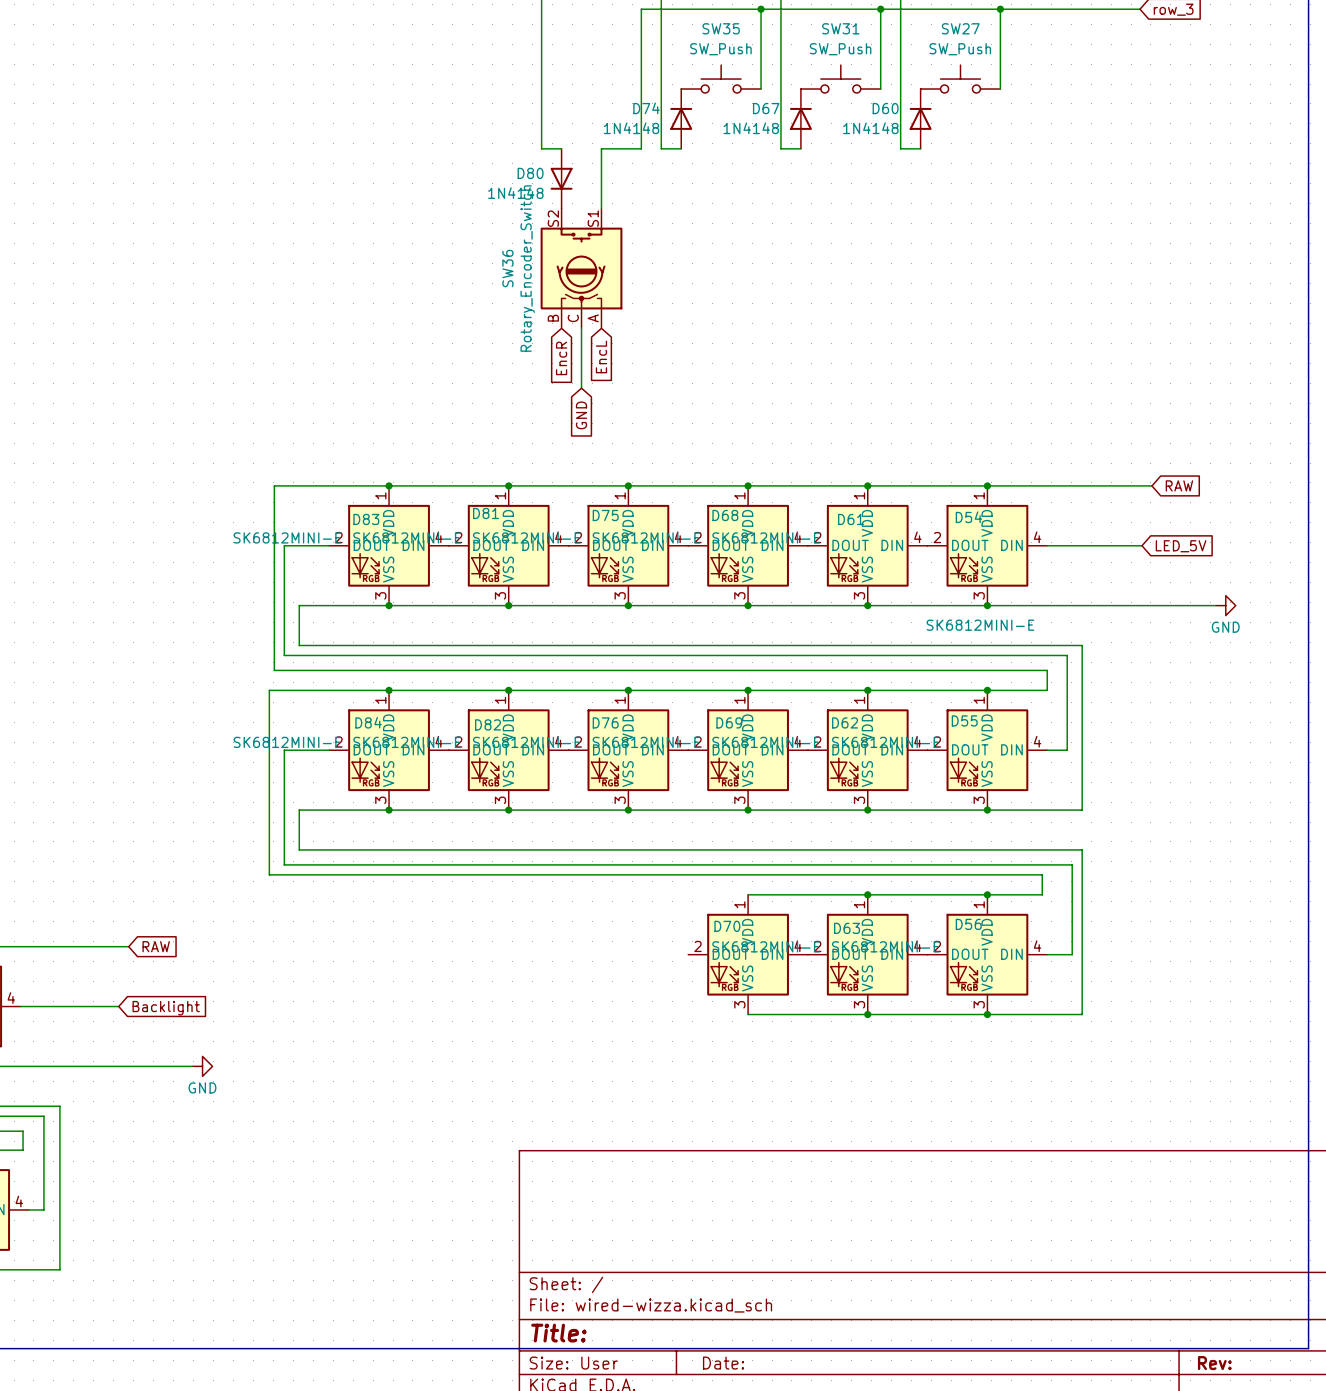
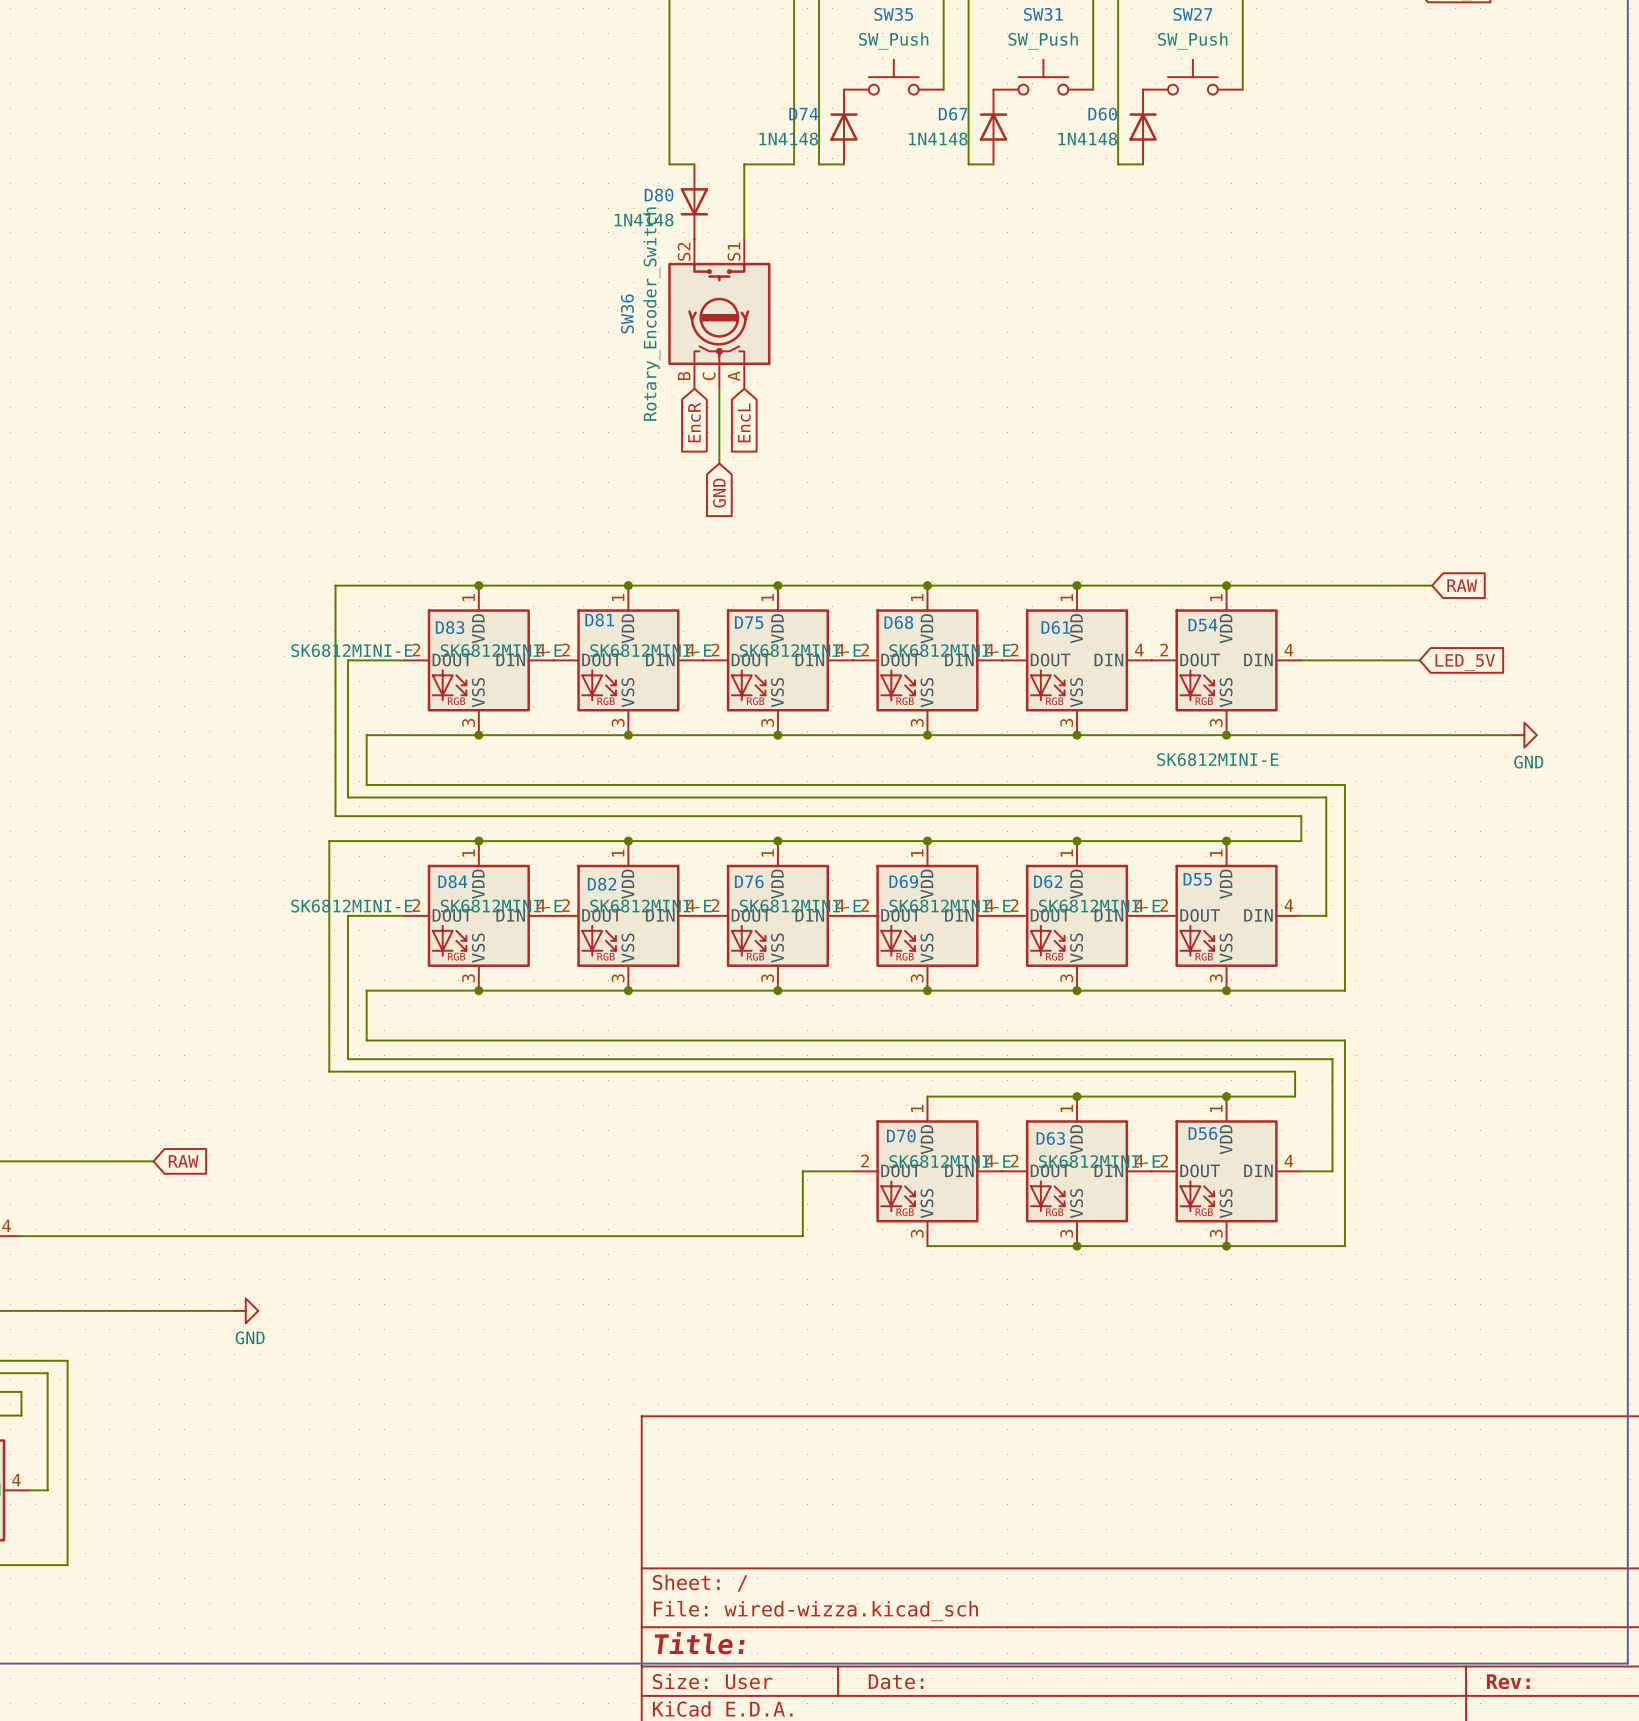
wire: none -> (852, 1171) (802, 1171) (802, 1236) (141, 1236)
global label: Backlight (166, 1008) -> none

